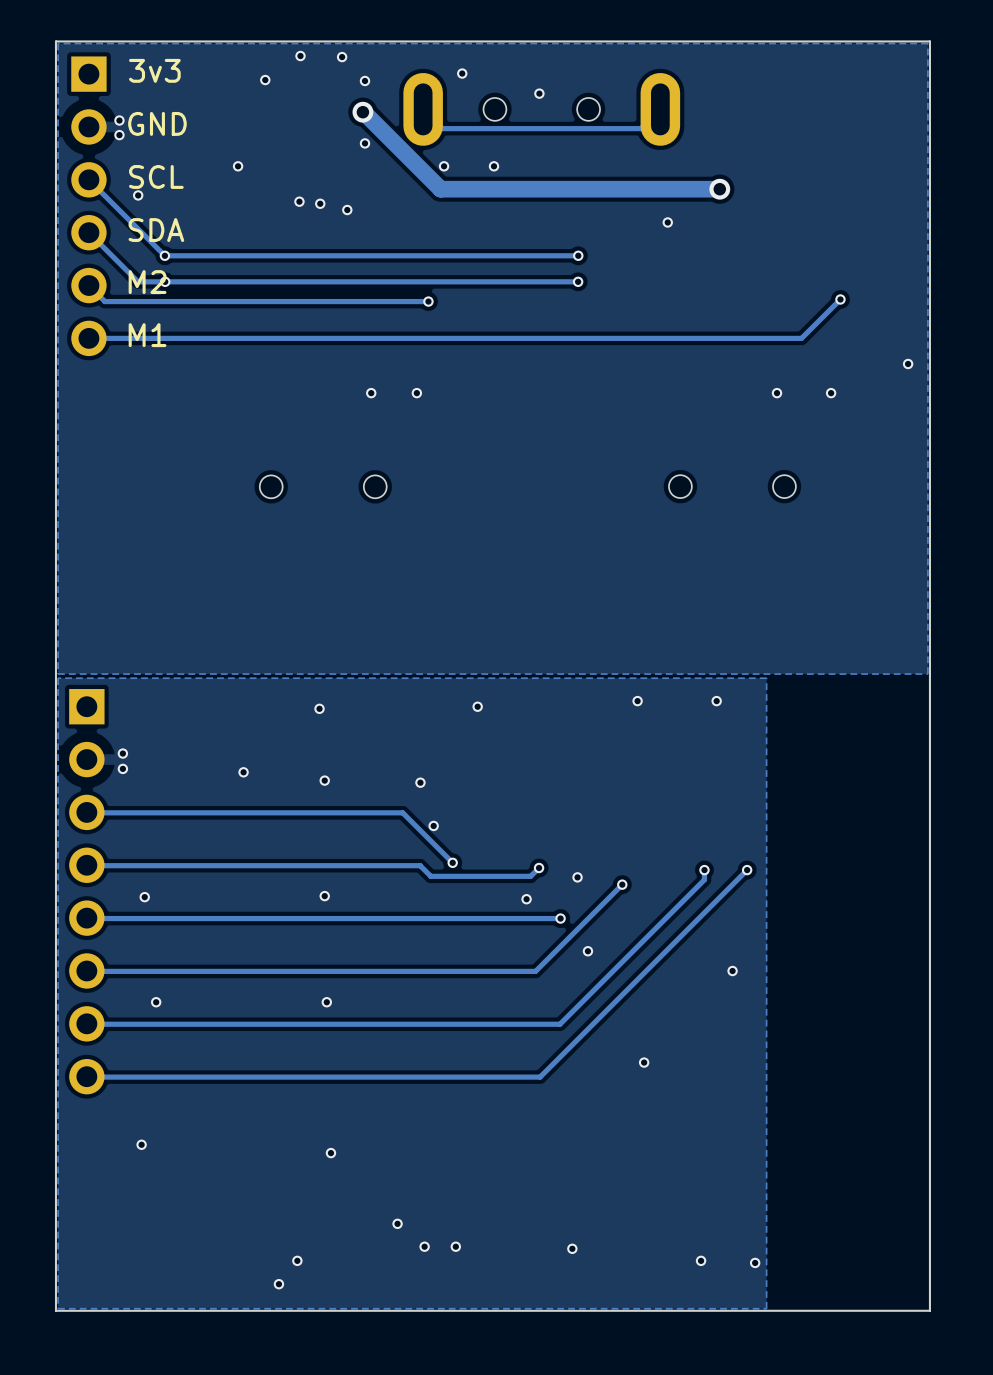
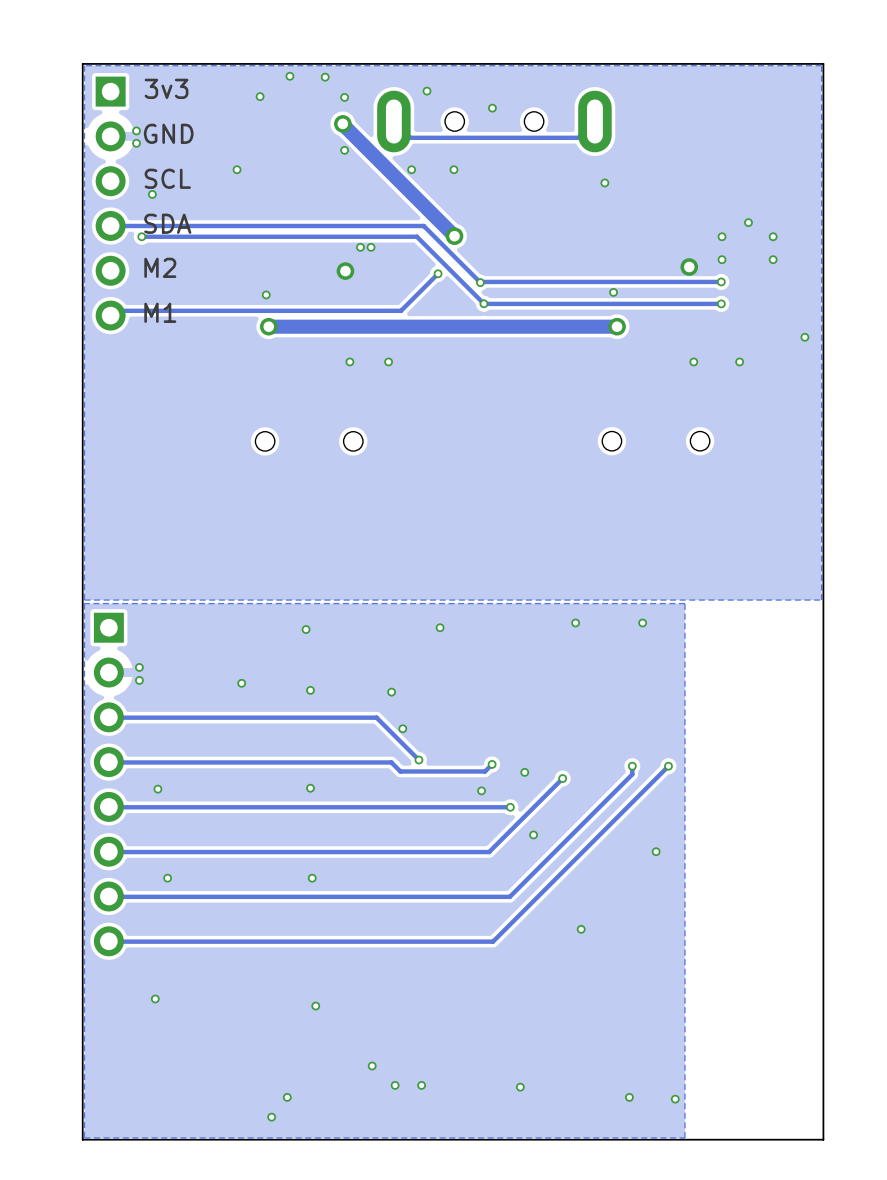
track: (362, 112) (440, 189) (719, 189) -> (342, 123) (454, 236)
track: (88, 179) (164, 255) (578, 255) -> none
via: (719, 189) -> none
via: (299, 201) -> none
via: (320, 203) -> none
via: (347, 210) -> none
via position: (667, 222) -> (604, 182)
via: none -> (748, 222)
track: (88, 232) (138, 281) (578, 281) -> (110, 225) (423, 225) (480, 282) (721, 281)
via: none -> (454, 236)
track: none -> (141, 236) (416, 236) (484, 303) (721, 303)
via: none -> (141, 236)
via: none -> (722, 236)
via: none -> (773, 236)
via: (164, 255) -> none
via: (578, 255) -> none
via: none -> (360, 247)
via: none -> (371, 247)
via: none -> (722, 259)
via: none -> (773, 259)
via: (165, 281) -> none
via: (578, 281) -> none
via: none -> (689, 267)
track: (88, 285) (104, 301) (428, 301) -> none
via: none -> (345, 271)
via: none -> (438, 273)
via: none -> (721, 281)
via: none -> (480, 282)
track: (840, 299) (801, 338) (88, 338) -> (438, 273) (401, 310) (115, 310) (110, 315)
via: (840, 299) -> none
via: (428, 301) -> none
via: none -> (613, 292)
via: none -> (266, 294)
via: none -> (483, 303)
via: none -> (721, 303)
via: none -> (268, 326)
track: none -> (617, 326) (268, 326)
via: none -> (617, 326)

